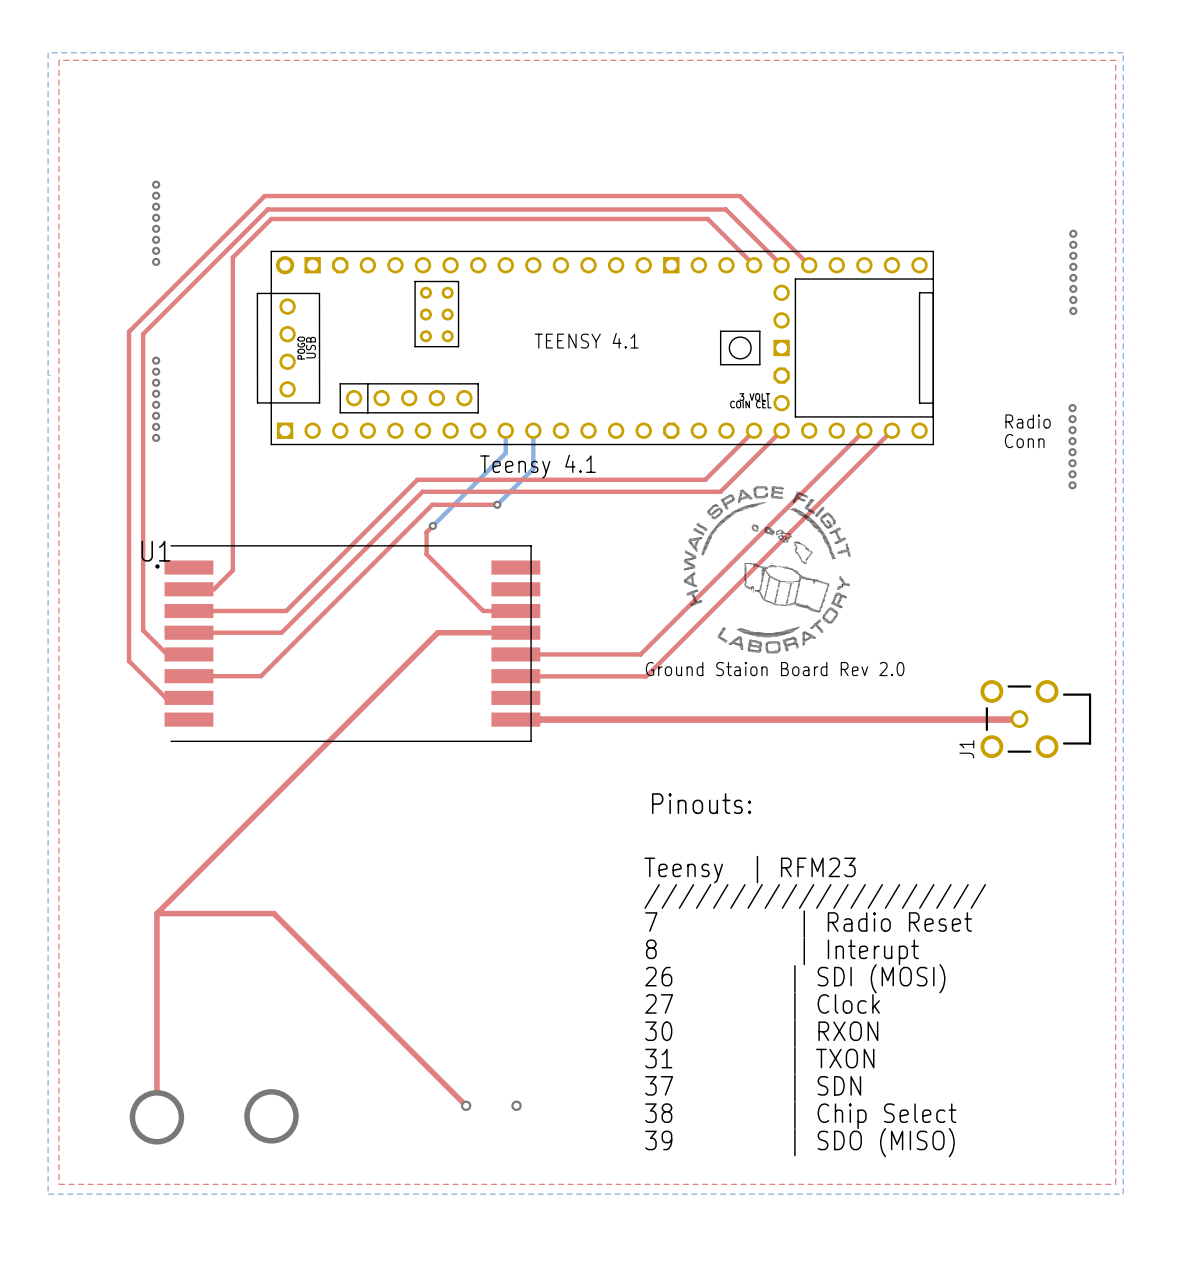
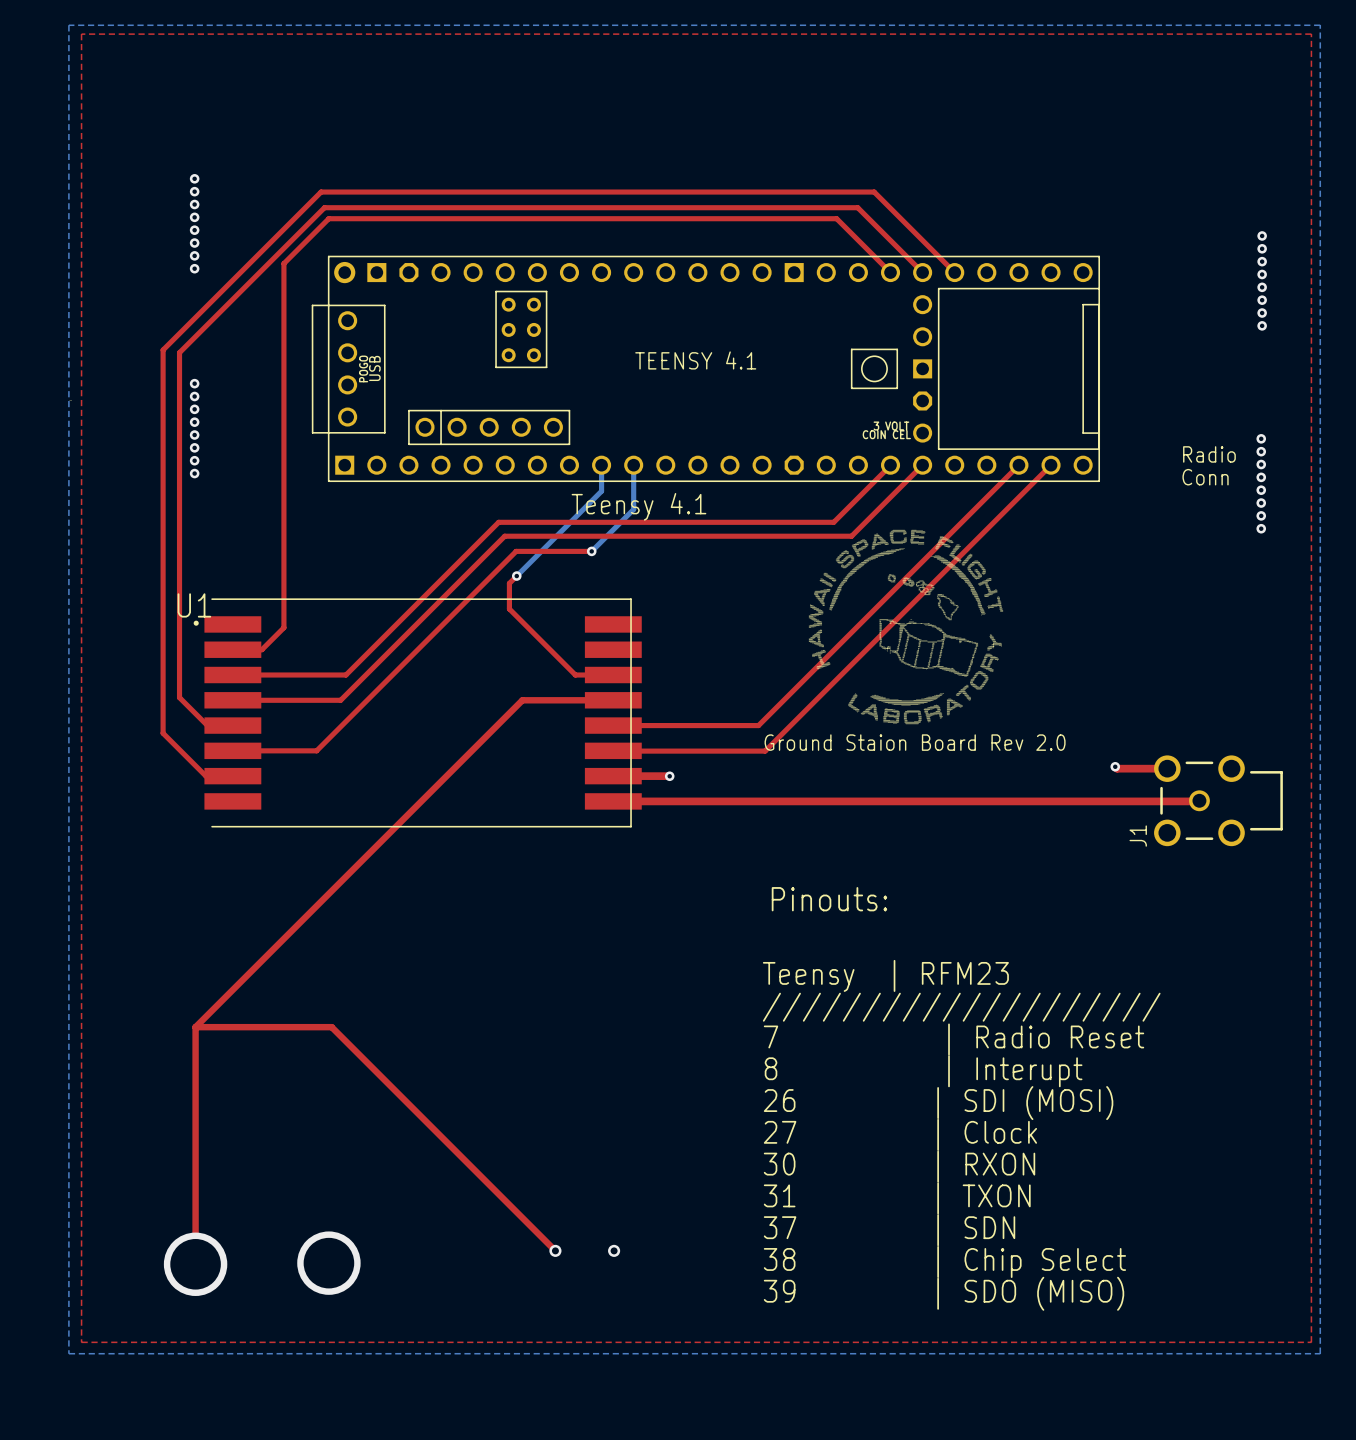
top track: none -> (1115, 766) (1117, 768) (1167, 768)
via: none -> (1115, 766)
top track: none -> (613, 776) (669, 776)
via: none -> (669, 776)

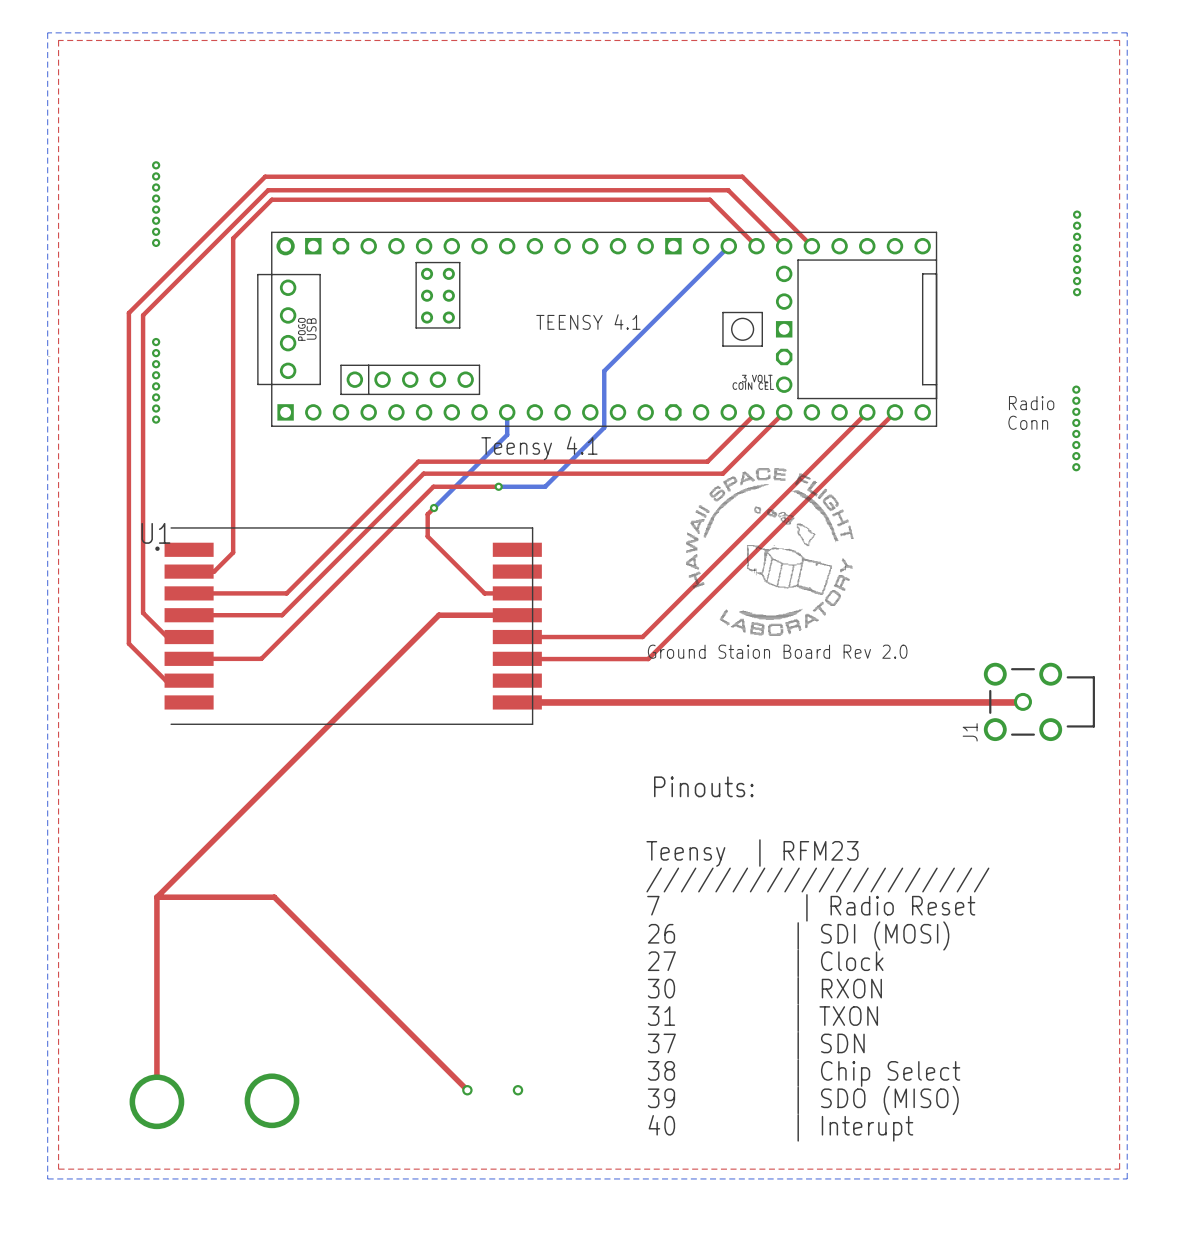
bottom track: (633, 465) (633, 509) (591, 551) -> (728, 246) (604, 371) (604, 427) (545, 486) (498, 486)
top track: (1115, 766) (1117, 768) (1167, 768) -> none
via: (1115, 766) -> none
top track: (613, 776) (669, 776) -> none
via: (669, 776) -> none
text: 8 | Interupt (923, 1071) -> 26 | SDI (MOSI) (798, 935)
text: 26 | SDI (MOSI) (938, 1103) -> 27 | Clock (765, 963)
text: 27 | Clock (900, 1134) -> 30 | RXON (764, 990)
text: 30 | RXON (899, 1166) -> 31 | TXON (762, 1018)
text: 31 | TXON (897, 1198) -> 37 | SDN (756, 1045)
text: 37 | SDN (889, 1230) -> 38 | Chip Select (804, 1073)
text: 38 | Chip Select (944, 1261) -> 39 | SDO (MISO) (803, 1100)
text: 39 | SDO (MISO) (944, 1293) -> 40 | Interupt (780, 1127)

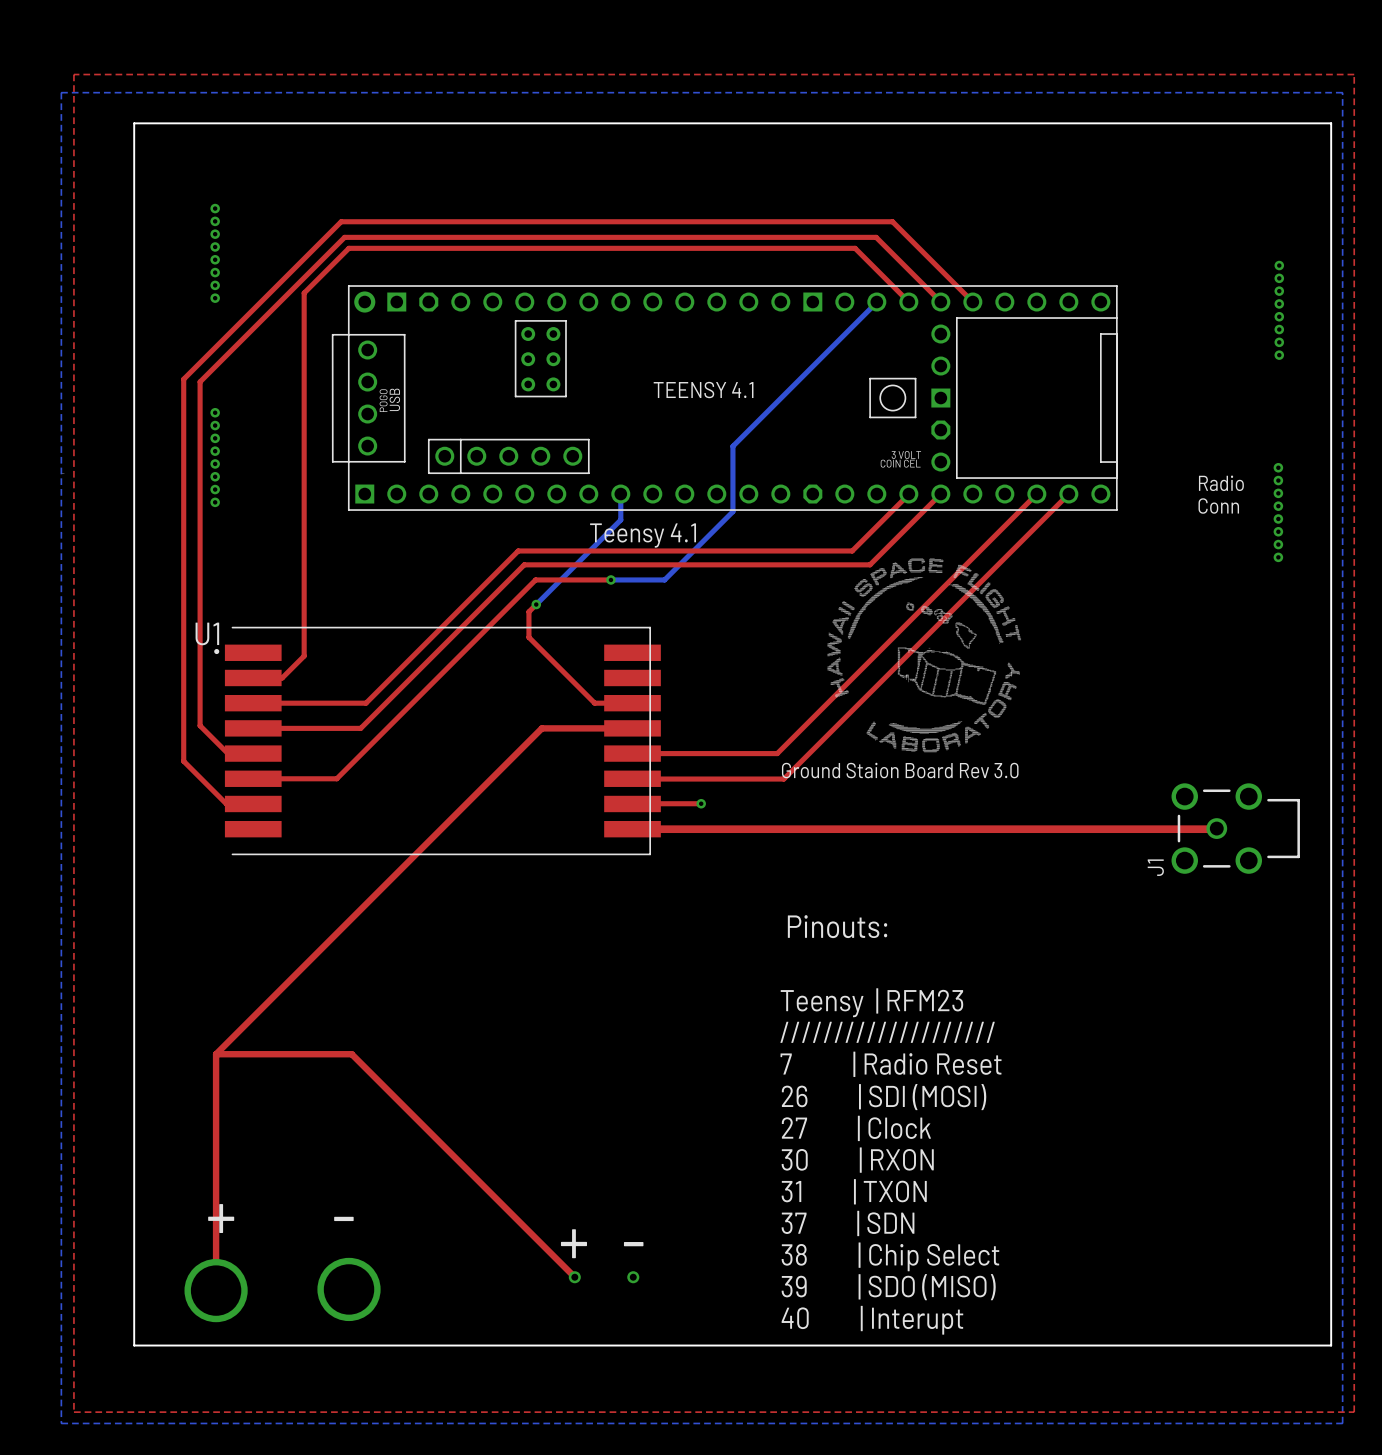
bottom zone outline: (47, 32) (47, 1178) (1127, 1178) (1127, 32) (47, 32) -> (61, 92) (61, 1423) (1342, 1423) (1342, 92) (61, 92)
top zone outline: (58, 40) (1119, 40) (1119, 1169) (58, 1169) (58, 40) -> (73, 74) (73, 1412) (1354, 1412) (1354, 74) (73, 74)
board edge: none -> (134, 123) (1331, 123) (1331, 1345) (134, 1345) (134, 123)
text: Ground Staion Board Rev 2.0 (777, 651) -> Ground Staion Board Rev 3.0 (900, 770)
top track: none -> (632, 803) (701, 803)
via: none -> (701, 803)
text: none -> + (221, 1218)
text: none -> - (343, 1218)
text: none -> + (573, 1243)
text: none -> - (633, 1244)

